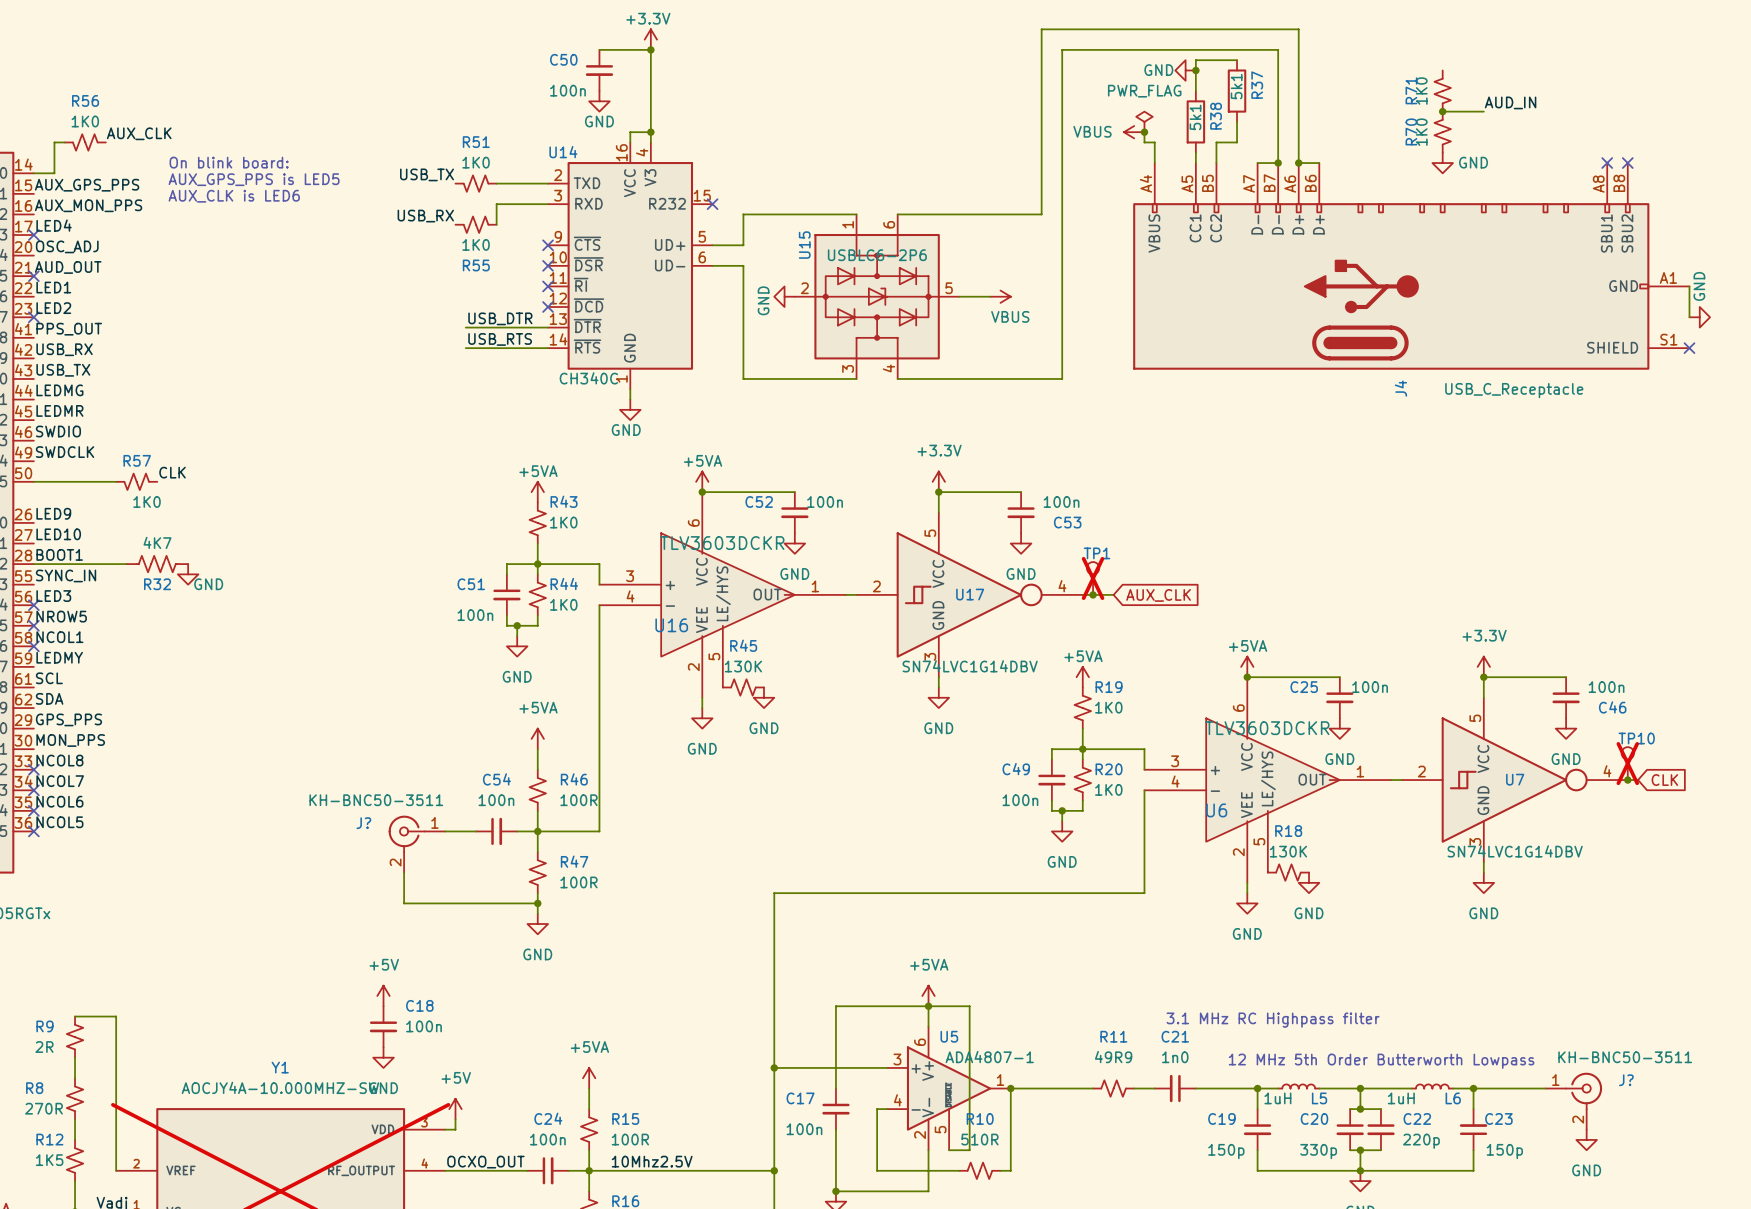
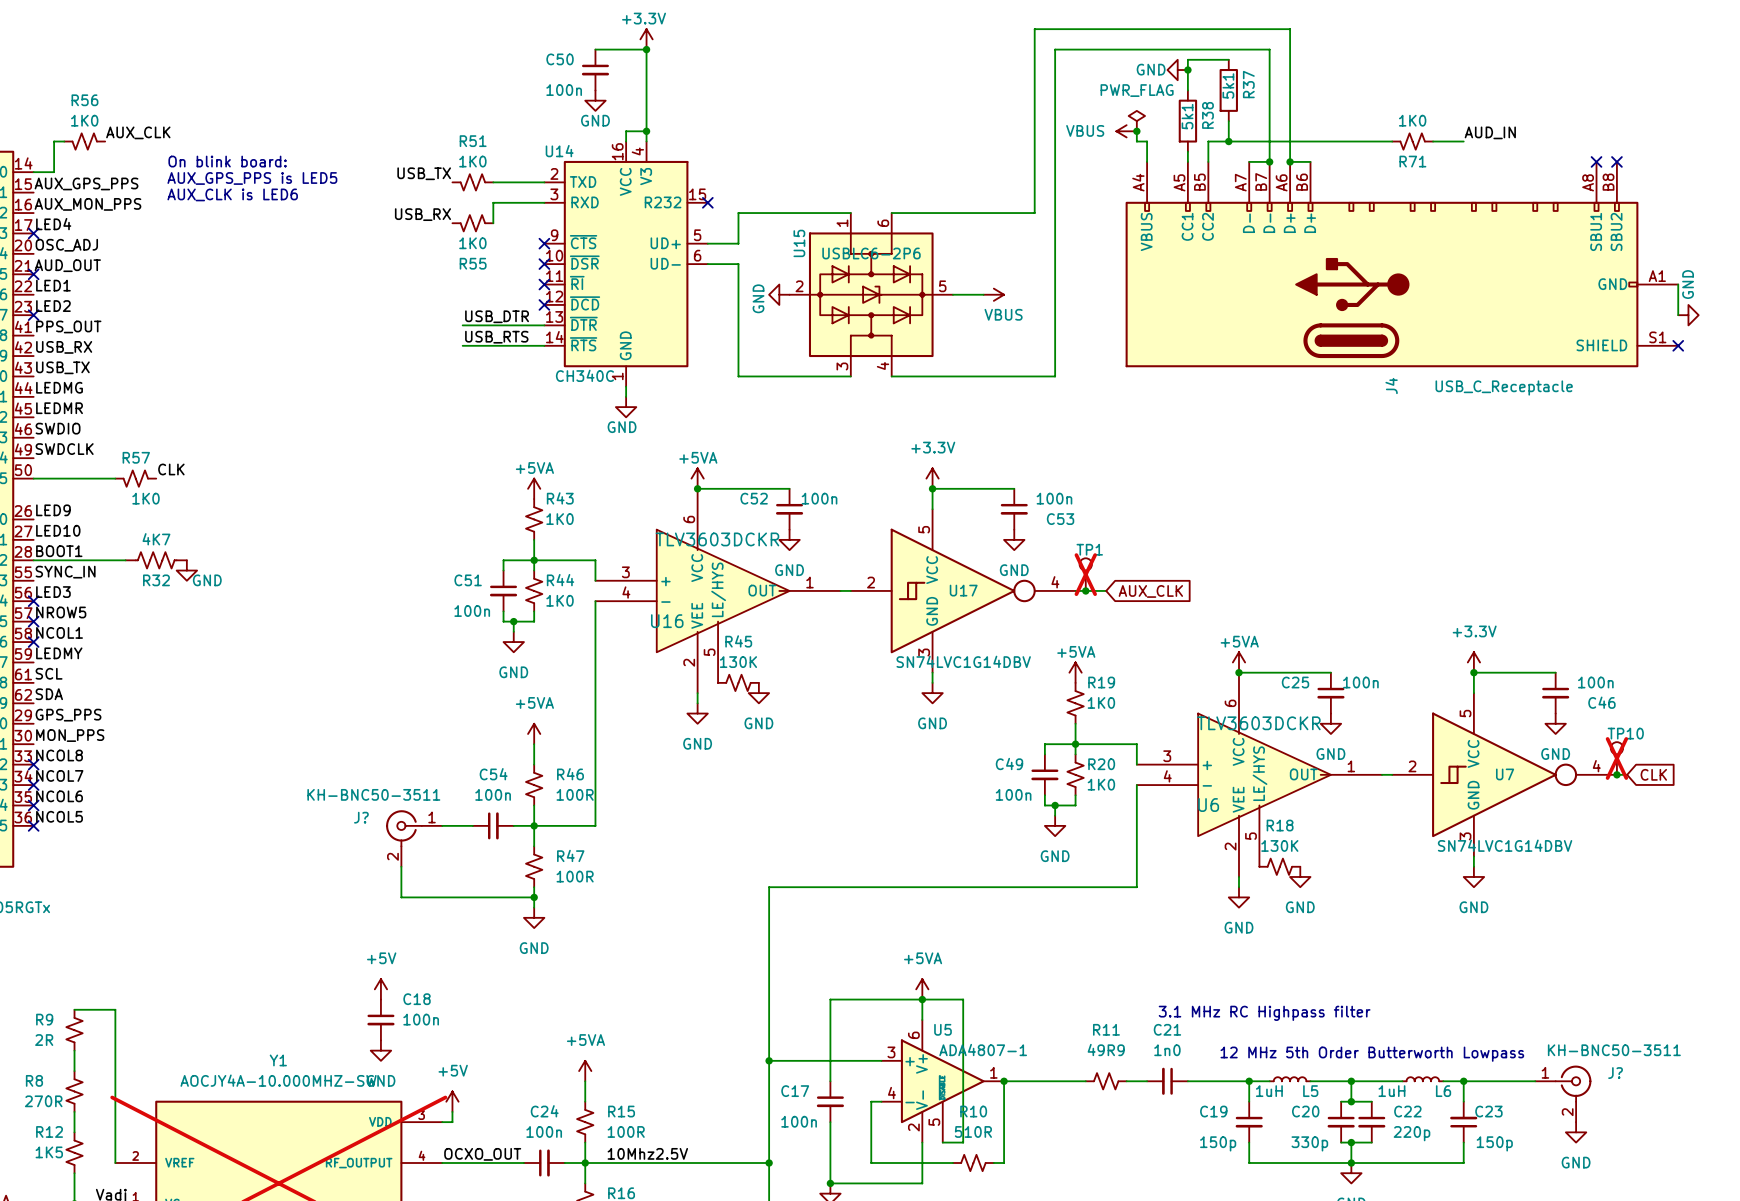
R71 name position: R71 (1411, 90) -> R71 (1412, 161)
R71 rotation: 0° (1442, 91) -> 90° clockwise (1412, 141)
R71 position: (1442, 91) -> (1412, 141)
label position: AUD_IN (1510, 102) -> AUD_IN (1490, 132)
wire: (1442, 111) (1483, 111) -> none
junction: (1442, 111) -> none
R70: 1K0 (1442, 132) -> none
wire: none -> (1228, 141) (1392, 141)
junction: none -> (1228, 141)
wire: none -> (1433, 141) (1463, 141)
power symbol: GND (1442, 163) -> none

